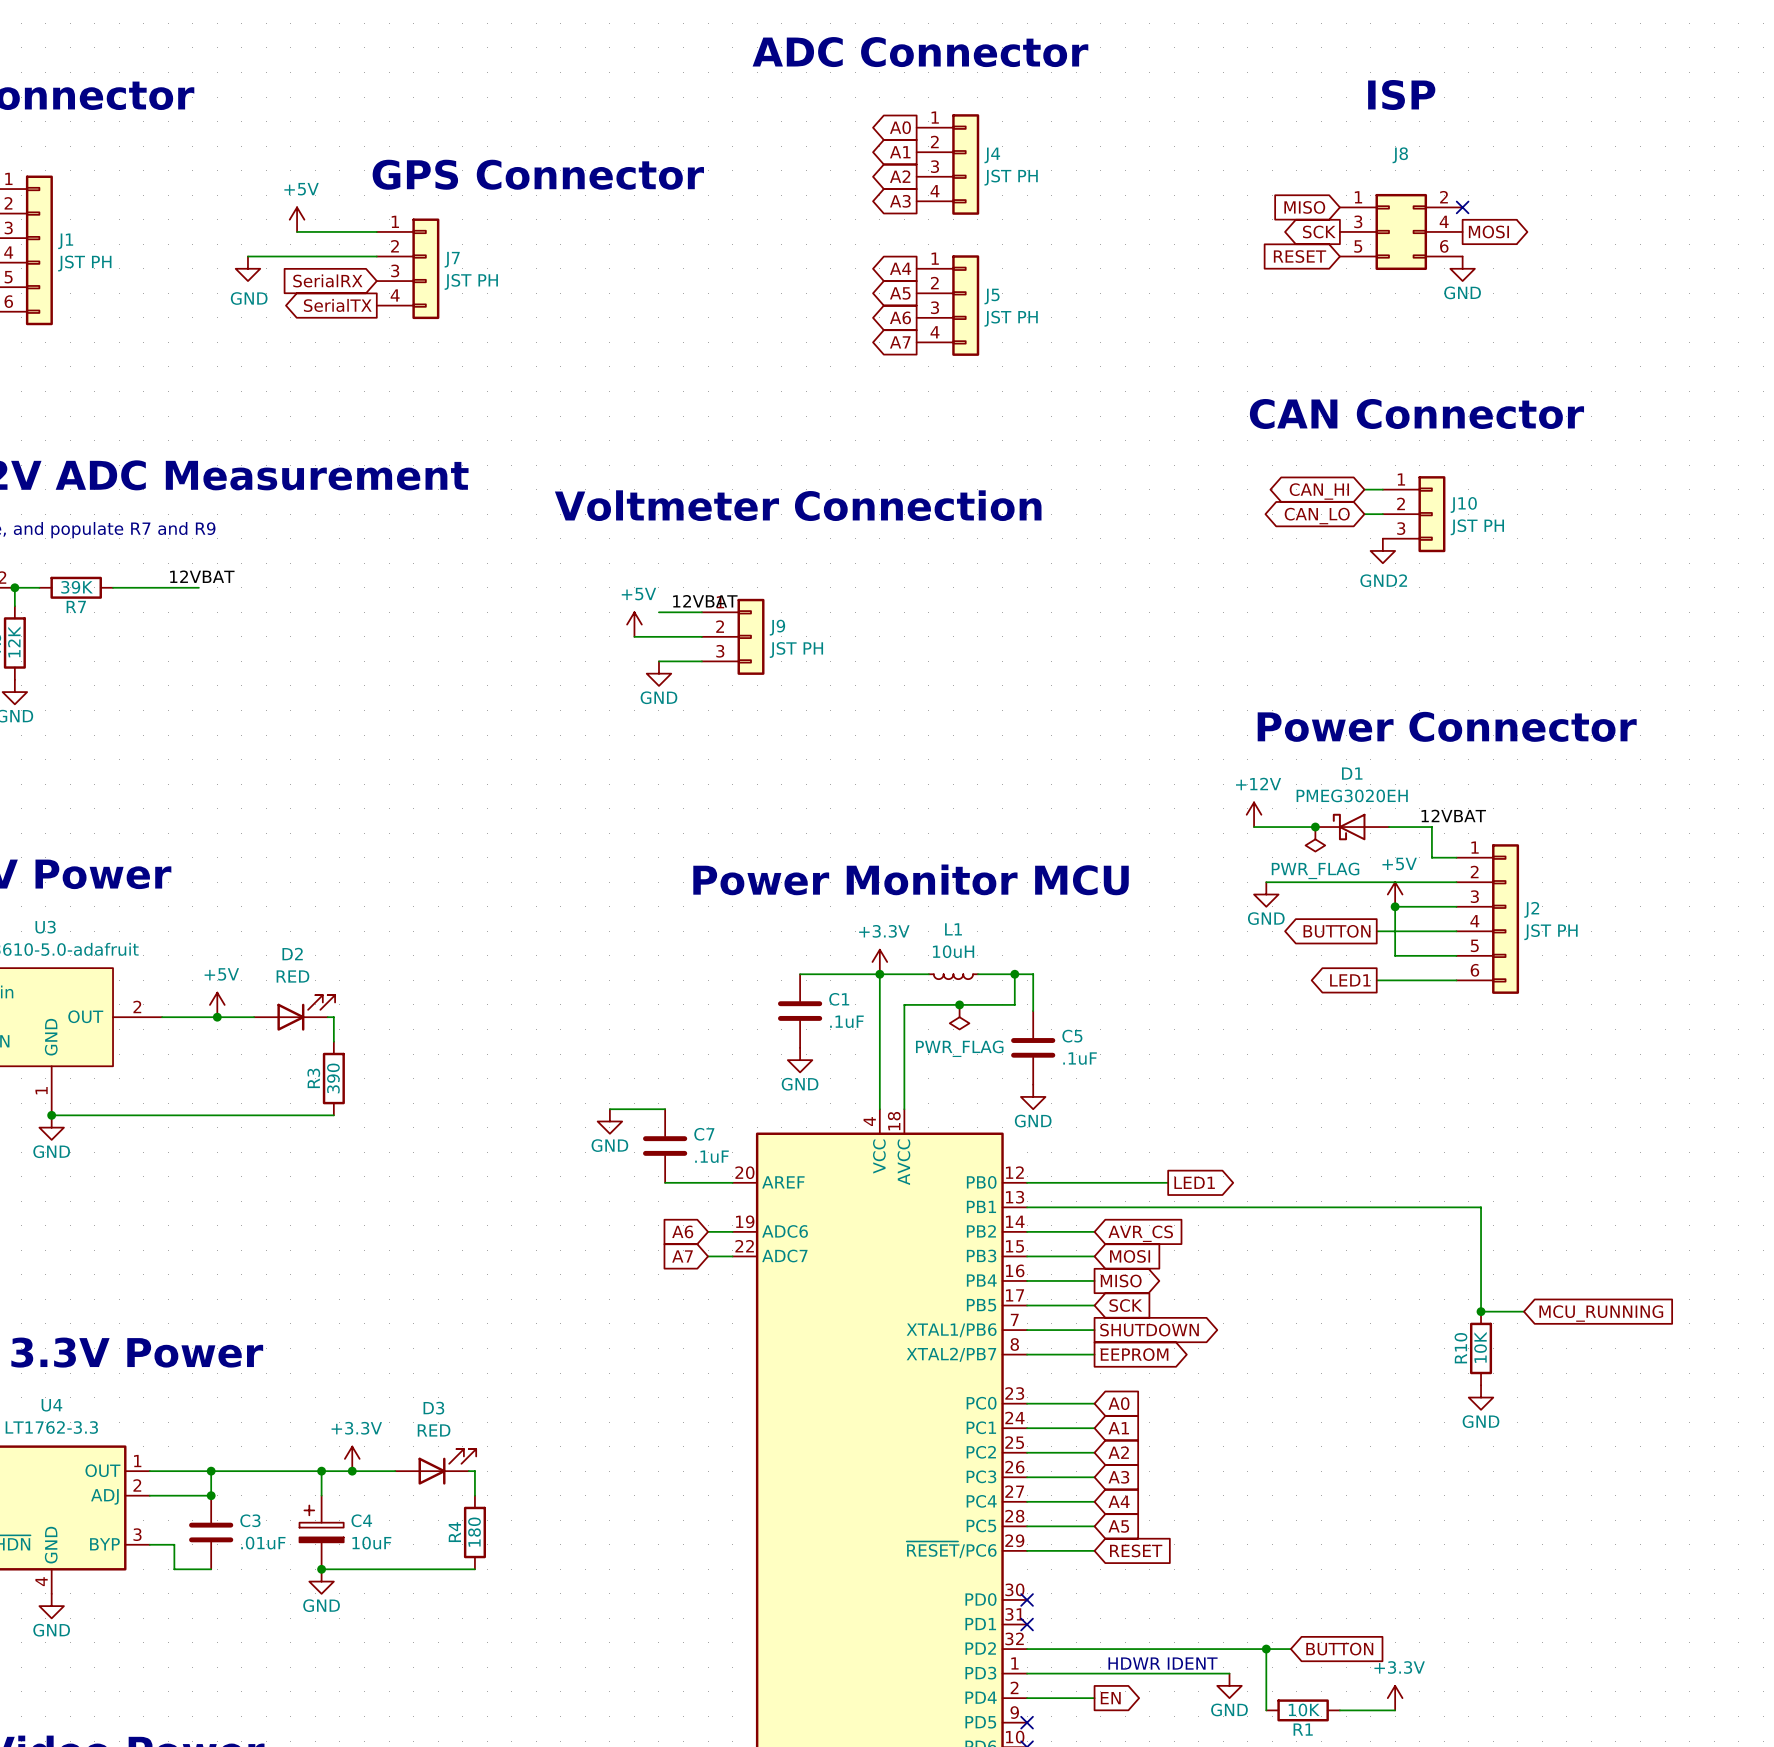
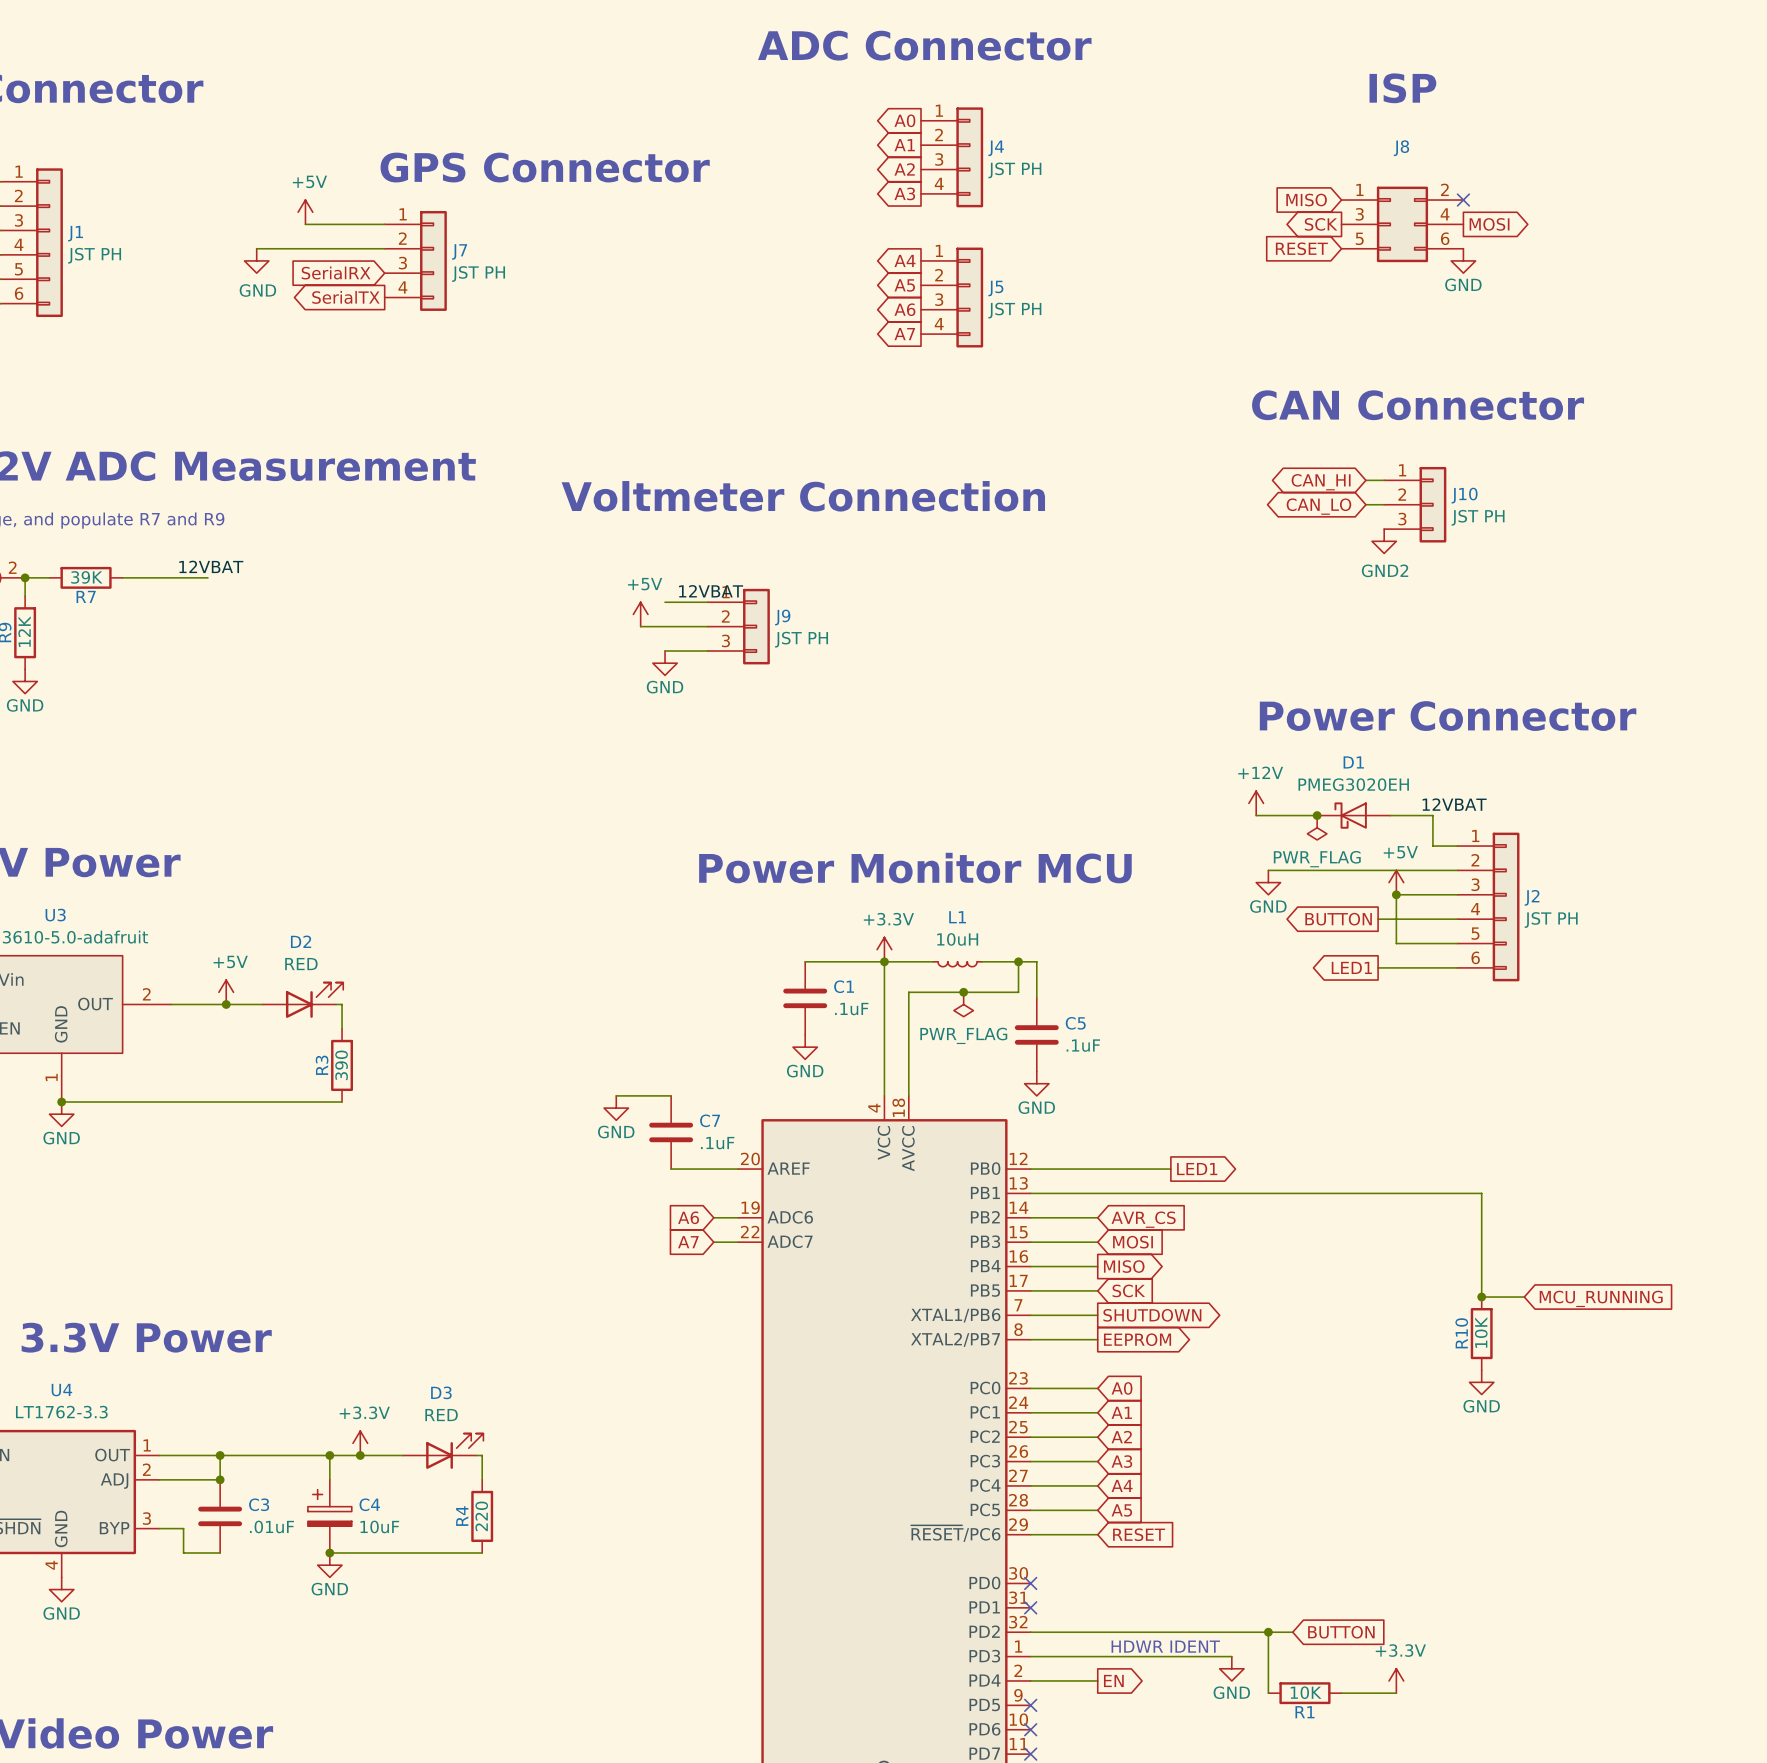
R4 value: 180 (474, 1532) -> 220 (481, 1516)

